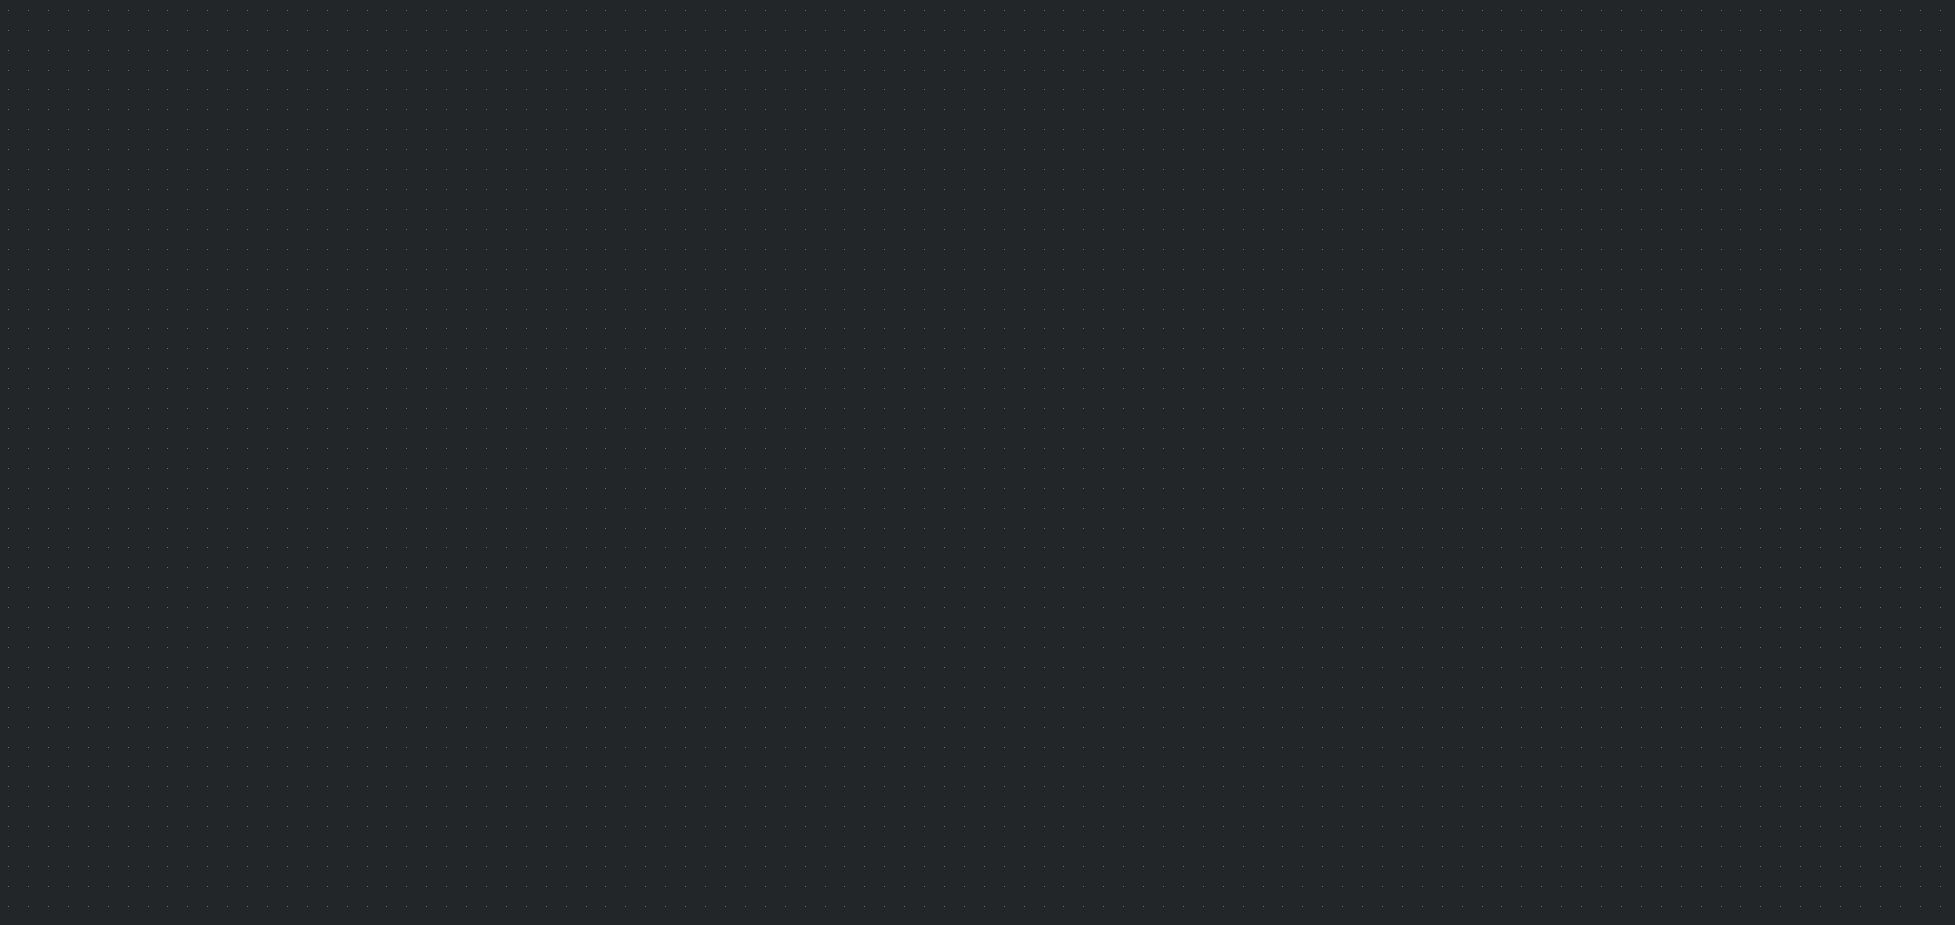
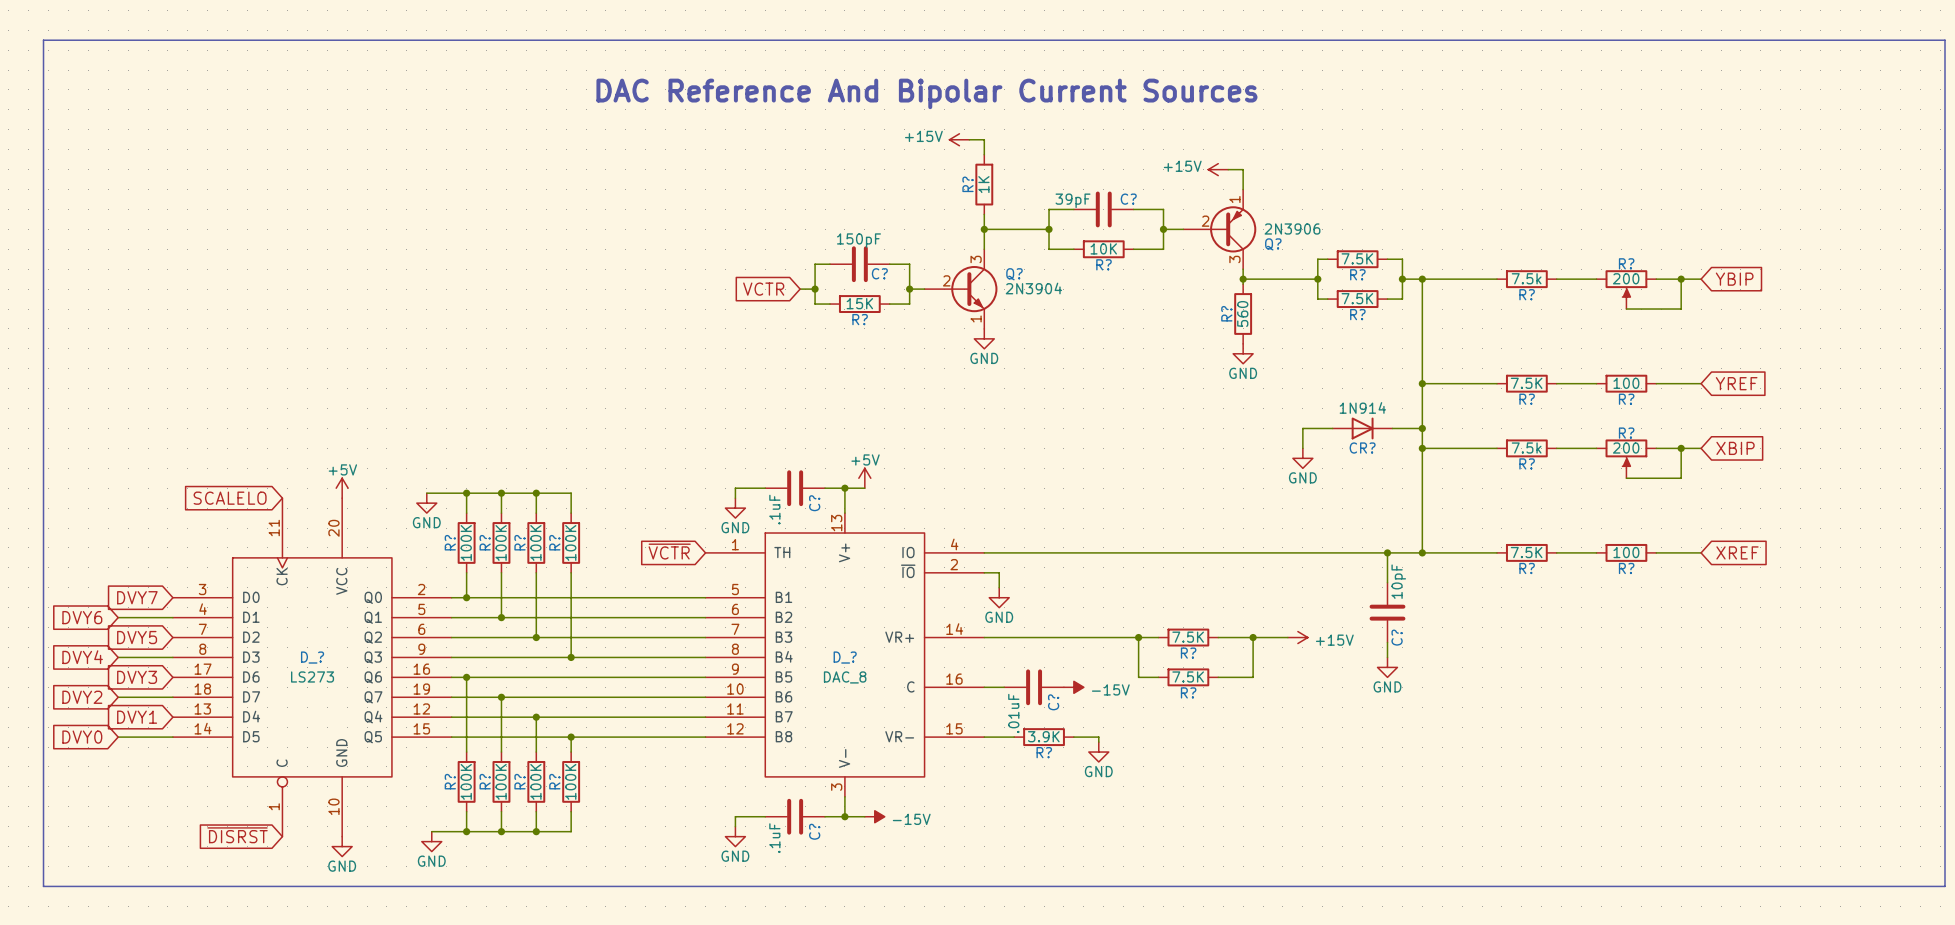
line: none -> (43, 40) (43, 886) (1944, 886) (1944, 40) (43, 40)
text: none -> DAC Reference And Bipolar Current Sources (926, 93)
power symbol: none -> +15V (959, 139)
wire: none -> (969, 139) (984, 139) (984, 154)
power symbol: none -> +15V (1218, 169)
wire: none -> (1228, 169) (1243, 169) (1243, 189)
R?: none -> 1K (984, 184)
wire: none -> (1073, 209) (1049, 209) (1049, 249) (1073, 249)
C?: none -> 39pF (1103, 209)
wire: none -> (1133, 209) (1163, 209) (1163, 249) (1133, 249)
wire: none -> (984, 214) (984, 249)
wire: none -> (984, 229) (1049, 229)
junction: none -> (984, 229)
junction: none -> (1049, 229)
wire: none -> (1163, 229) (1183, 229)
junction: none -> (1163, 229)
Q?: none -> 2N3906 (1219, 229)
R?: none -> 10K (1103, 249)
wire: none -> (1327, 259) (1317, 259) (1317, 299) (1327, 299)
R?: none -> 7.5K (1357, 259)
wire: none -> (1387, 259) (1402, 259) (1402, 299) (1387, 299)
wire: none -> (829, 264) (815, 264) (815, 304) (829, 304)
C?: none -> 150pF (859, 264)
wire: none -> (889, 264) (909, 264) (909, 304) (889, 304)
wire: none -> (1243, 269) (1243, 284)
wire: none -> (1243, 279) (1317, 279)
junction: none -> (1243, 279)
junction: none -> (1317, 279)
wire: none -> (1402, 279) (1497, 279)
junction: none -> (1402, 279)
wire: none -> (1422, 279) (1422, 552)
junction: none -> (1422, 279)
R?: none -> 7.5k (1526, 279)
wire: none -> (1556, 279) (1596, 279)
wire: none -> (1656, 279) (1701, 279)
wire: none -> (1681, 279) (1681, 309) (1626, 309)
junction: none -> (1681, 279)
global label: none -> YBIP (1734, 279)
global label: none -> VCTR (763, 289)
wire: none -> (800, 289) (815, 289)
junction: none -> (815, 289)
wire: none -> (909, 289) (924, 289)
junction: none -> (909, 289)
Q?: none -> 2N3904 (961, 289)
R?: none -> 200 (1626, 289)
R?: none -> 7.5K (1357, 299)
R?: none -> 15K (859, 304)
R?: none -> 560 (1243, 313)
power symbol: none -> GND (984, 338)
power symbol: none -> GND (1243, 353)
wire: none -> (1422, 383) (1497, 383)
junction: none -> (1422, 383)
R?: none -> 7.5K (1526, 383)
wire: none -> (1556, 383) (1596, 383)
R?: none -> 100 (1626, 383)
wire: none -> (1656, 383) (1701, 383)
global label: none -> YREF (1736, 383)
wire: none -> (1332, 428) (1302, 428) (1302, 448)
CR?: none -> 1N914 (1362, 428)
wire: none -> (1392, 428) (1422, 428)
junction: none -> (1422, 428)
wire: none -> (1422, 448) (1497, 448)
junction: none -> (1422, 448)
R?: none -> 7.5k (1526, 448)
wire: none -> (1556, 448) (1596, 448)
wire: none -> (1656, 448) (1701, 448)
wire: none -> (1681, 448) (1681, 478) (1626, 478)
junction: none -> (1681, 448)
global label: none -> XBIP (1735, 448)
power symbol: none -> GND (1302, 458)
R?: none -> 200 (1626, 458)
power symbol: none -> +5V (864, 478)
power symbol: none -> +5V (342, 488)
wire: none -> (765, 488) (735, 488) (735, 498)
C?: none -> .1uF (795, 488)
wire: none -> (825, 488) (864, 488)
wire: none -> (844, 488) (844, 513)
junction: none -> (844, 488)
wire: none -> (426, 493) (571, 493) (571, 513)
wire: none -> (466, 493) (466, 513)
junction: none -> (466, 493)
wire: none -> (501, 493) (501, 513)
junction: none -> (501, 493)
wire: none -> (536, 493) (536, 513)
junction: none -> (536, 493)
global label: none -> SCALELO (230, 498)
power symbol: none -> GND (426, 503)
power symbol: none -> GND (735, 508)
R?: none -> 100K (466, 542)
R?: none -> 100K (501, 542)
R?: none -> 100K (536, 542)
R?: none -> 100K (571, 542)
global label: none -> ~{VCTR} (669, 551)
wire: none -> (984, 552) (1497, 552)
wire: none -> (1387, 552) (1387, 582)
junction: none -> (1387, 552)
junction: none -> (1422, 552)
R?: none -> 7.5K (1526, 552)
wire: none -> (1556, 552) (1596, 552)
R?: none -> 100 (1626, 552)
wire: none -> (1656, 552) (1701, 552)
global label: none -> XREF (1737, 552)
wire: none -> (466, 572) (466, 597)
wire: none -> (501, 572) (501, 617)
wire: none -> (536, 572) (536, 637)
wire: none -> (571, 572) (571, 657)
wire: none -> (984, 572) (999, 572) (999, 587)
global label: none -> DVY7 (137, 597)
wire: none -> (451, 597) (705, 597)
junction: none -> (466, 597)
power symbol: none -> GND (999, 597)
C?: none -> 10pF (1387, 612)
global label: none -> DVY6 (82, 617)
wire: none -> (118, 617) (172, 617)
wire: none -> (451, 617) (705, 617)
junction: none -> (501, 617)
global label: none -> DVY5 (137, 637)
wire: none -> (451, 637) (705, 637)
junction: none -> (536, 637)
wire: none -> (984, 637) (1158, 637)
wire: none -> (1138, 637) (1138, 677) (1158, 677)
junction: none -> (1138, 637)
R?: none -> 7.5K (1188, 637)
wire: none -> (1218, 637) (1287, 637)
wire: none -> (1253, 637) (1253, 677) (1218, 677)
junction: none -> (1253, 637)
power symbol: none -> +15V (1297, 637)
wire: none -> (1387, 642) (1387, 657)
D_?: none -> DAC_8 (844, 654)
global label: none -> DVY4 (82, 657)
wire: none -> (118, 657) (172, 657)
wire: none -> (451, 657) (705, 657)
junction: none -> (571, 657)
D_?: none -> LS273 (312, 667)
power symbol: none -> GND (1387, 667)
global label: none -> DVY3 (137, 677)
wire: none -> (451, 677) (705, 677)
wire: none -> (466, 677) (466, 752)
junction: none -> (466, 677)
R?: none -> 7.5K (1188, 677)
wire: none -> (984, 687) (1004, 687)
C?: none -> .01uF (1034, 687)
power symbol: none -> -15V (1073, 687)
global label: none -> DVY2 (82, 697)
wire: none -> (118, 697) (172, 697)
wire: none -> (451, 697) (705, 697)
wire: none -> (501, 697) (501, 752)
junction: none -> (501, 697)
global label: none -> DVY1 (137, 717)
wire: none -> (451, 717) (705, 717)
wire: none -> (536, 717) (536, 752)
junction: none -> (536, 717)
global label: none -> DVY0 (82, 737)
wire: none -> (118, 737) (172, 737)
wire: none -> (451, 737) (705, 737)
wire: none -> (571, 737) (571, 752)
junction: none -> (571, 737)
wire: none -> (984, 737) (1014, 737)
R?: none -> 3.9K (1044, 737)
wire: none -> (1073, 737) (1098, 737) (1098, 742)
power symbol: none -> GND (1098, 752)
R?: none -> 100K (466, 781)
R?: none -> 100K (501, 781)
R?: none -> 100K (536, 781)
R?: none -> 100K (571, 781)
wire: none -> (844, 796) (844, 816)
wire: none -> (466, 811) (466, 831)
wire: none -> (501, 811) (501, 831)
wire: none -> (536, 811) (536, 831)
wire: none -> (571, 811) (571, 831) (431, 831)
wire: none -> (765, 816) (735, 816) (735, 826)
C?: none -> .1uF (795, 816)
wire: none -> (825, 816) (864, 816)
junction: none -> (844, 816)
power symbol: none -> -15V (874, 816)
junction: none -> (466, 831)
junction: none -> (501, 831)
junction: none -> (536, 831)
global label: none -> ~{DISRST} (237, 835)
power symbol: none -> GND (735, 836)
power symbol: none -> GND (431, 841)
power symbol: none -> GND (342, 846)

